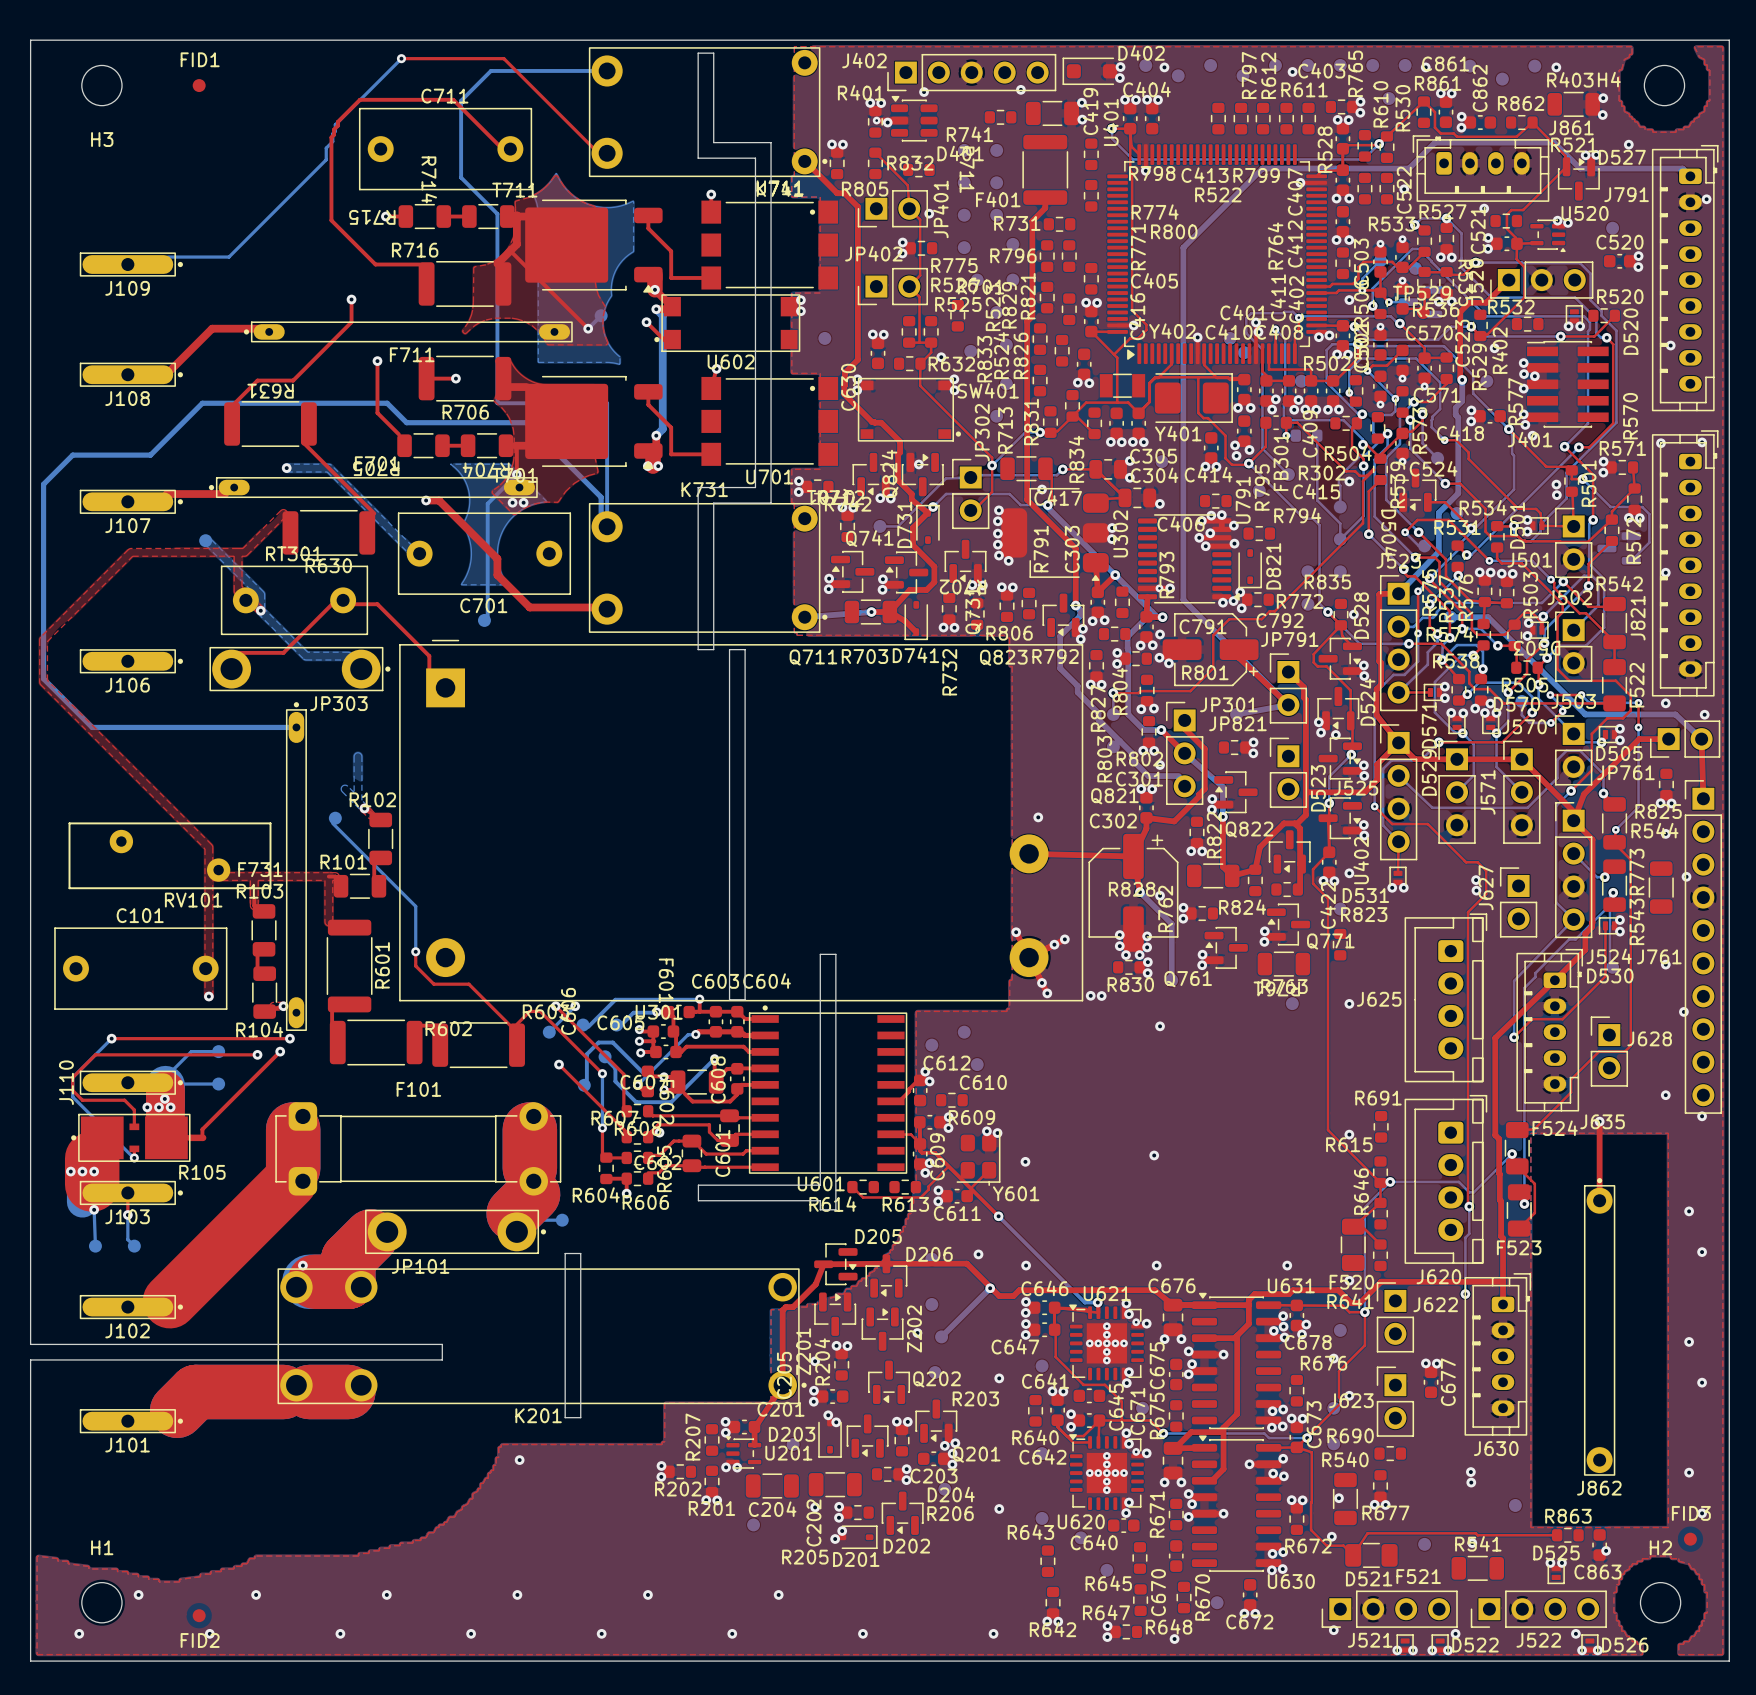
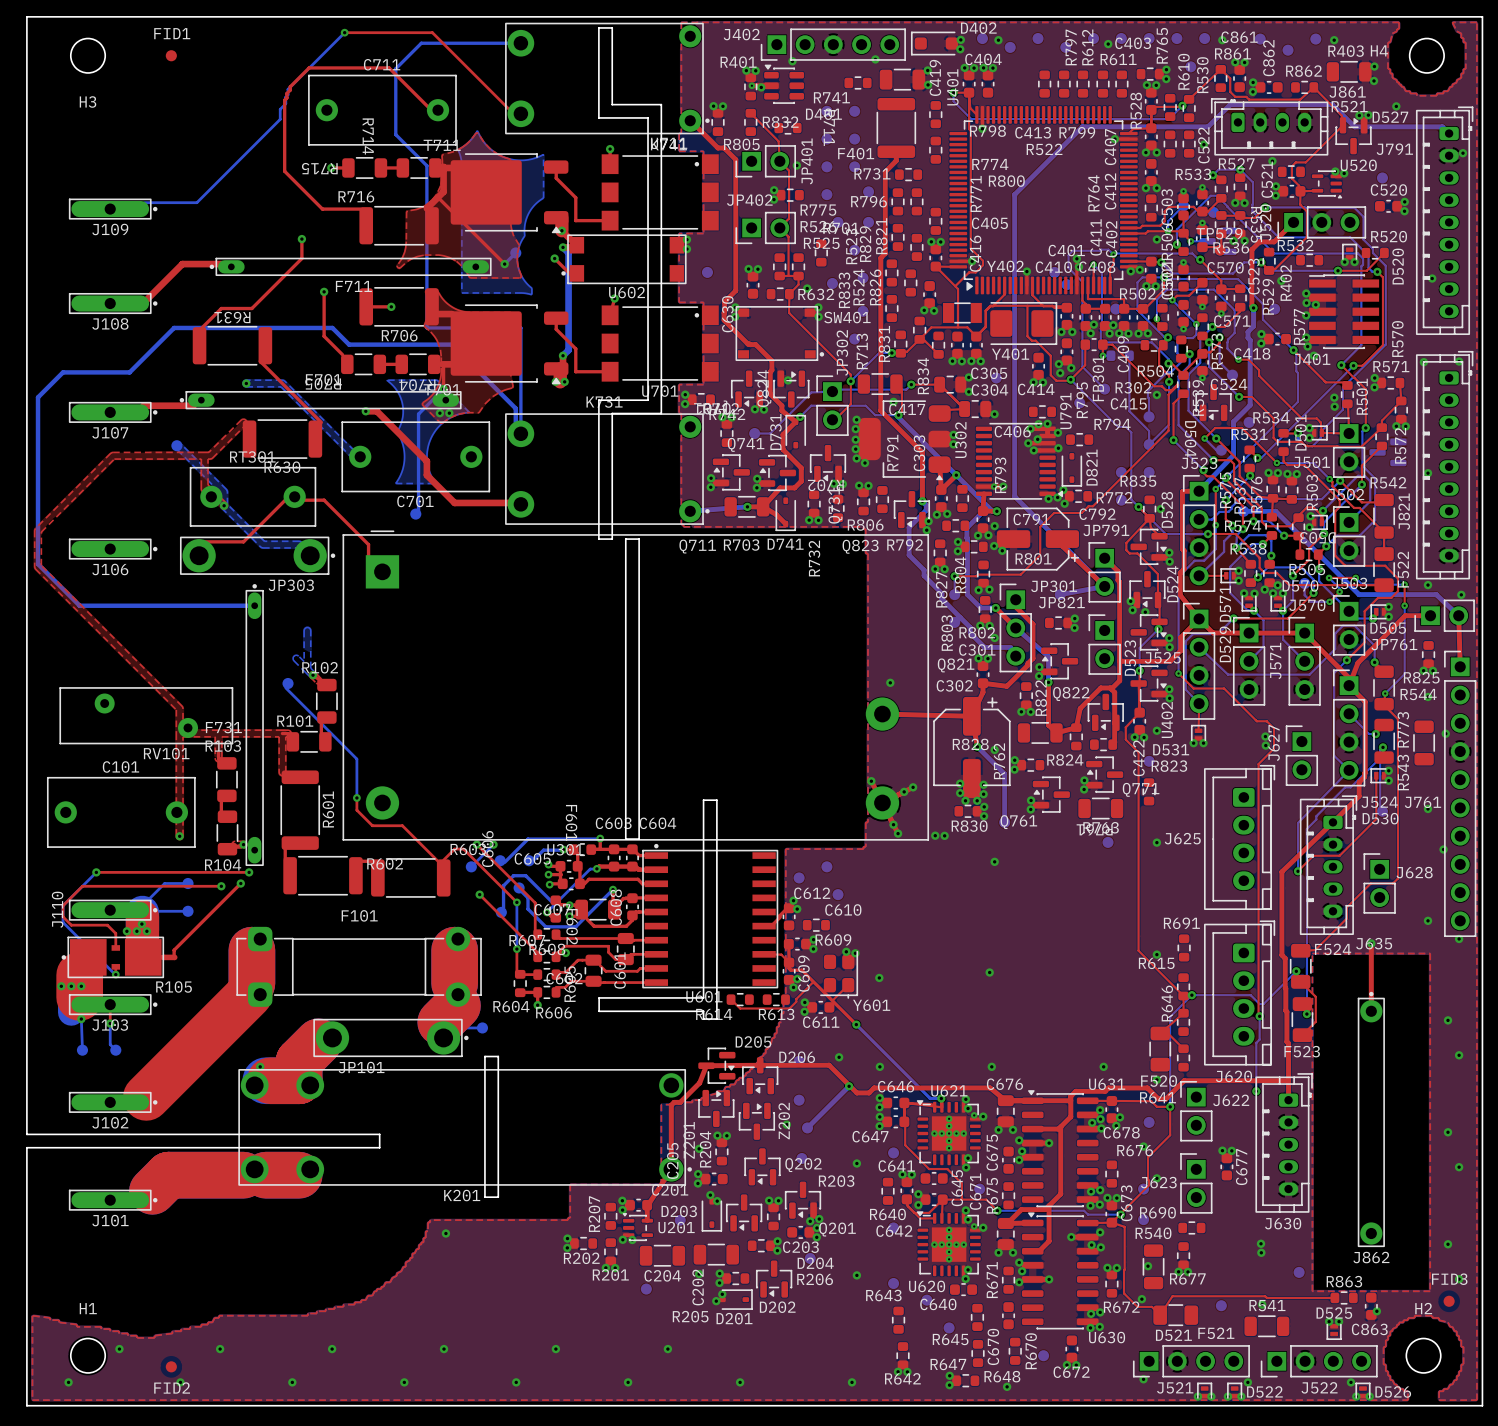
top track: (1571, 470) (1571, 479) (1582, 479) -> none
bottom track: (1582, 479) (1610, 506) (1642, 506) (1649, 514) (1649, 542) (1631, 560) -> none
via: (1582, 479) -> none
top track: (1427, 502) (1445, 502) (1471, 528) -> none
via: (1471, 528) -> none

